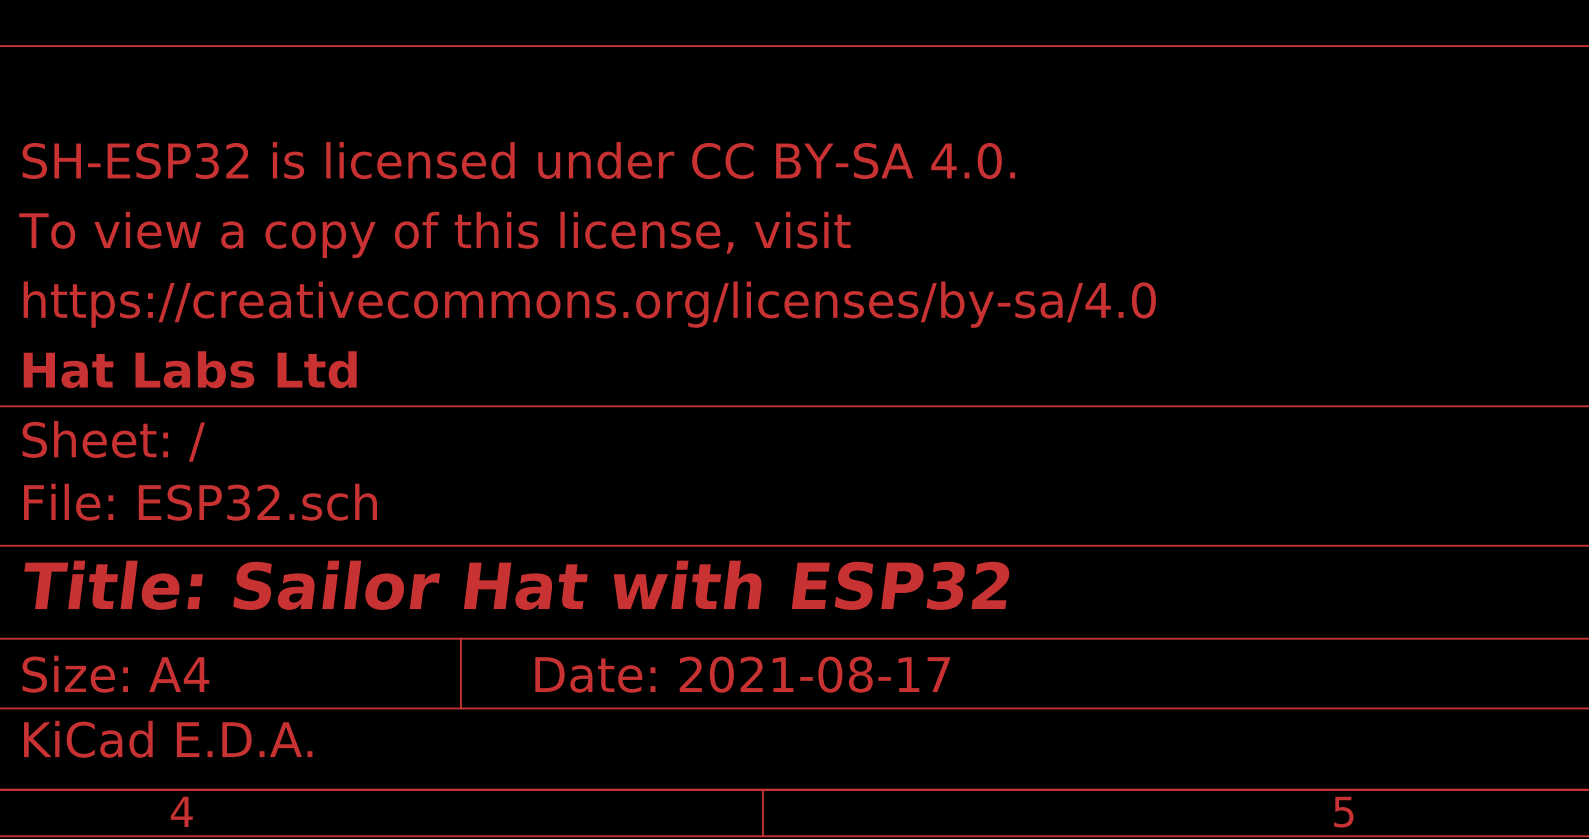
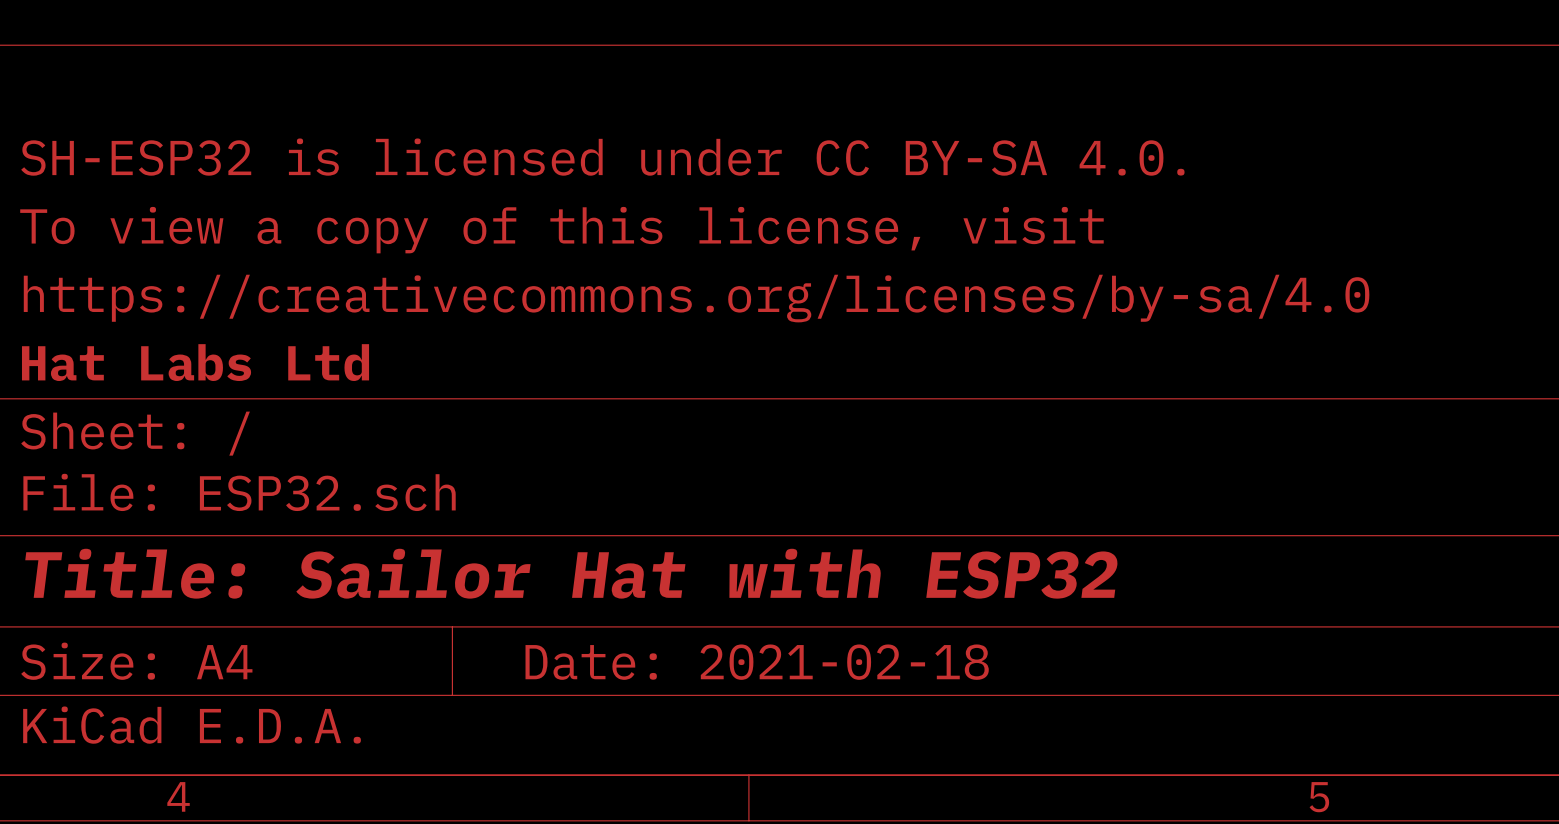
title block: Date: 2021-08-17 (742, 674) -> Date: 2021-02-18 (757, 662)

